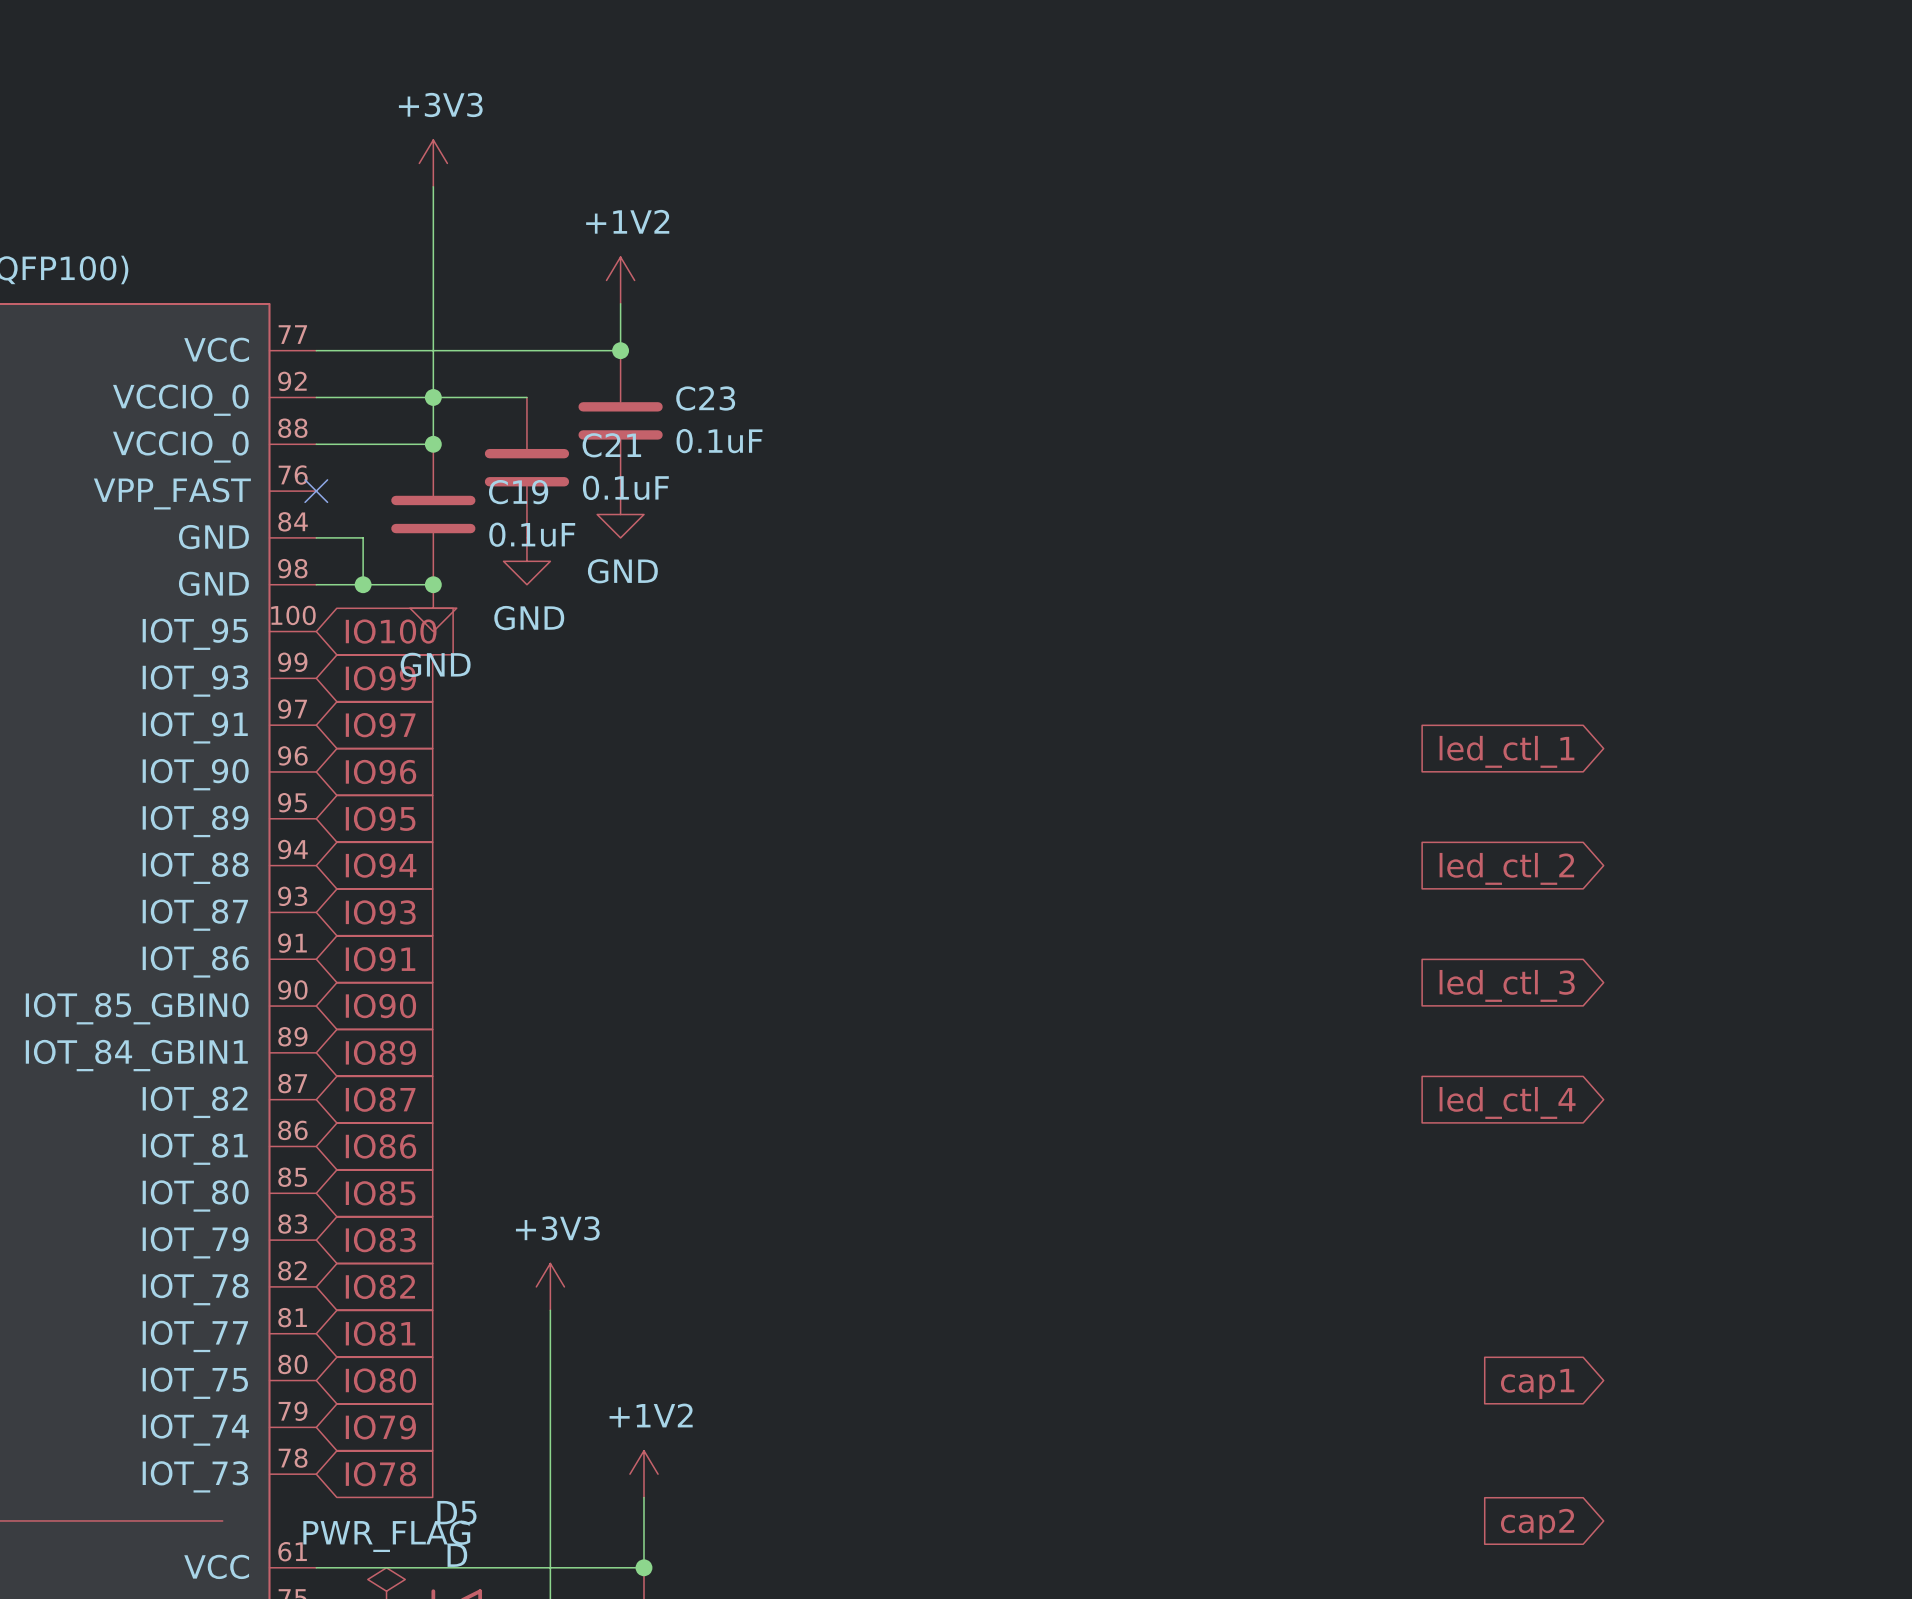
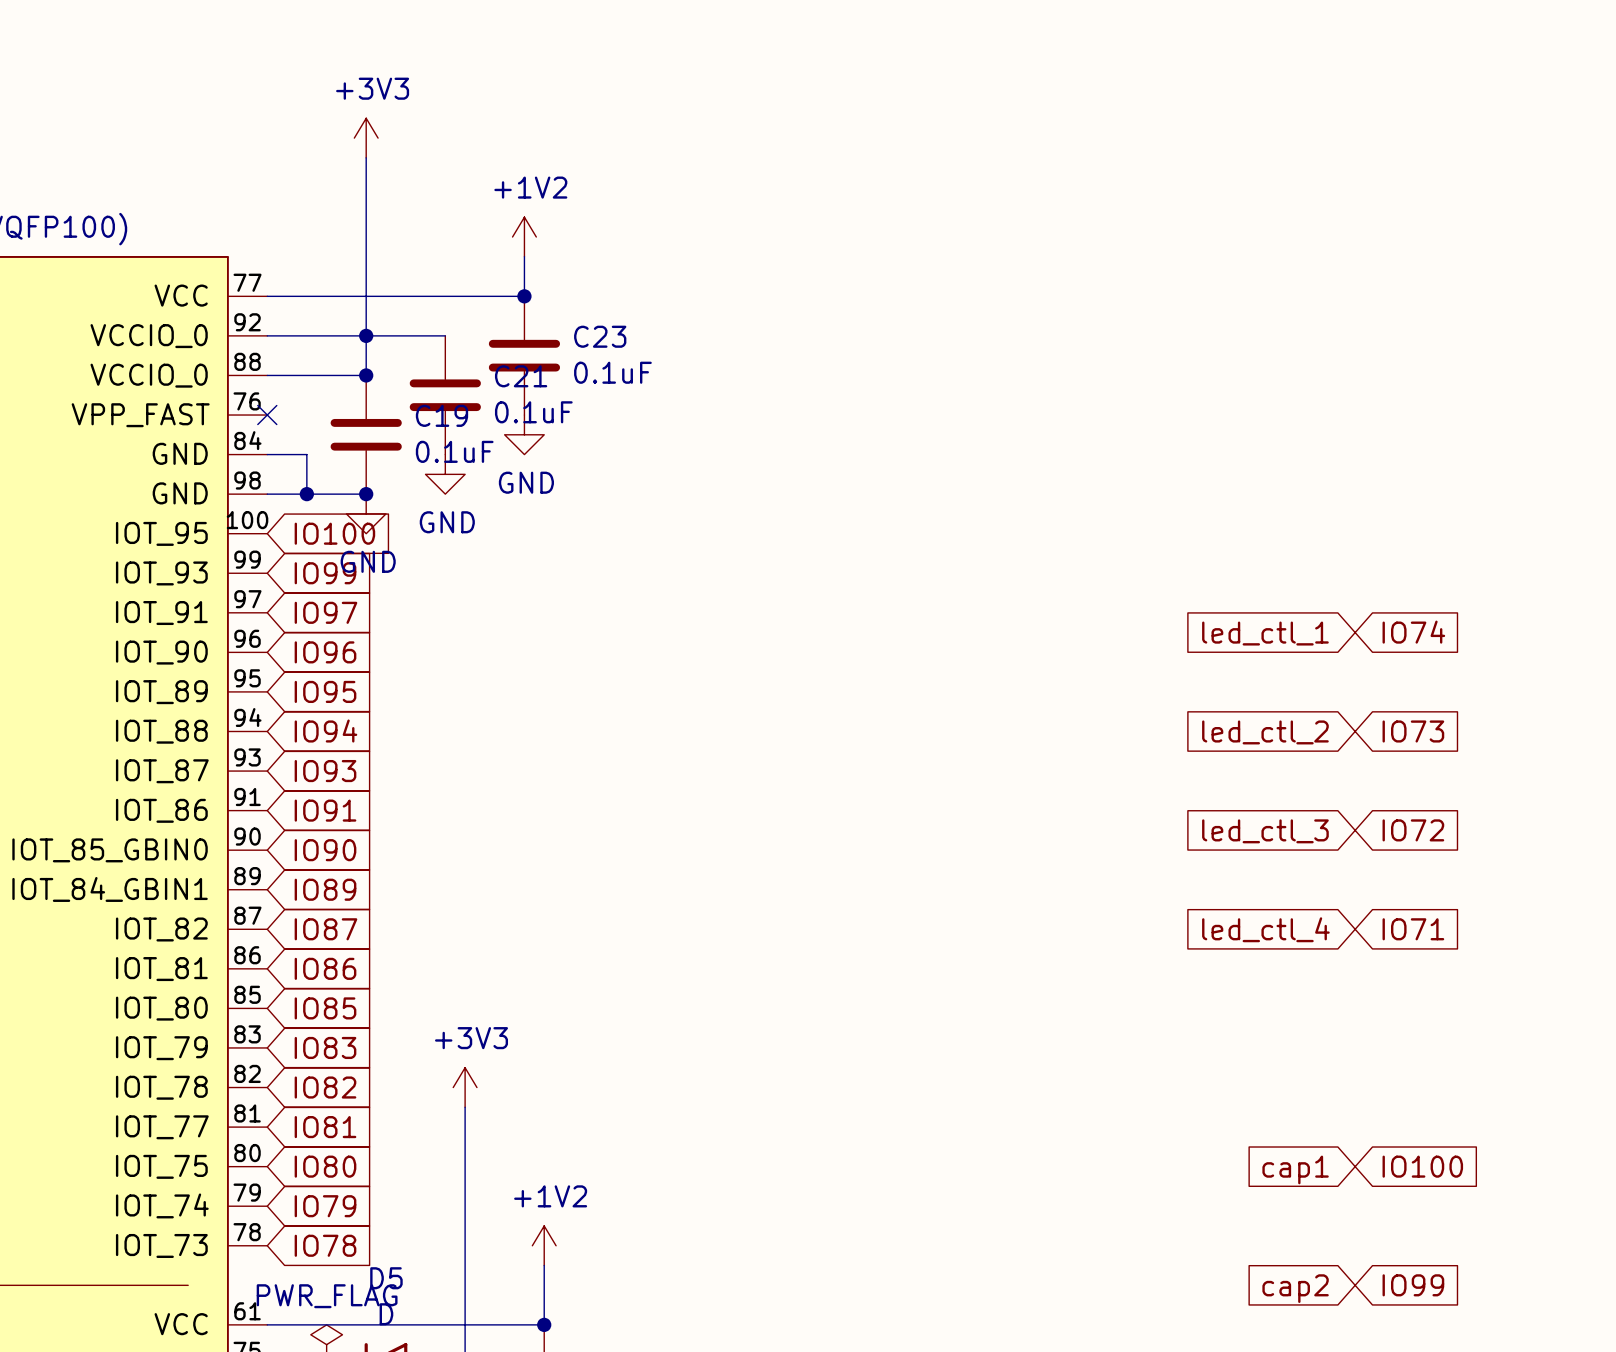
global label: none -> IO74 (1413, 632)
global label: none -> IO73 (1413, 731)
global label: none -> IO72 (1413, 830)
global label: none -> IO71 (1413, 929)
global label: none -> IO100 (1422, 1166)
global label: none -> IO99 (1413, 1285)

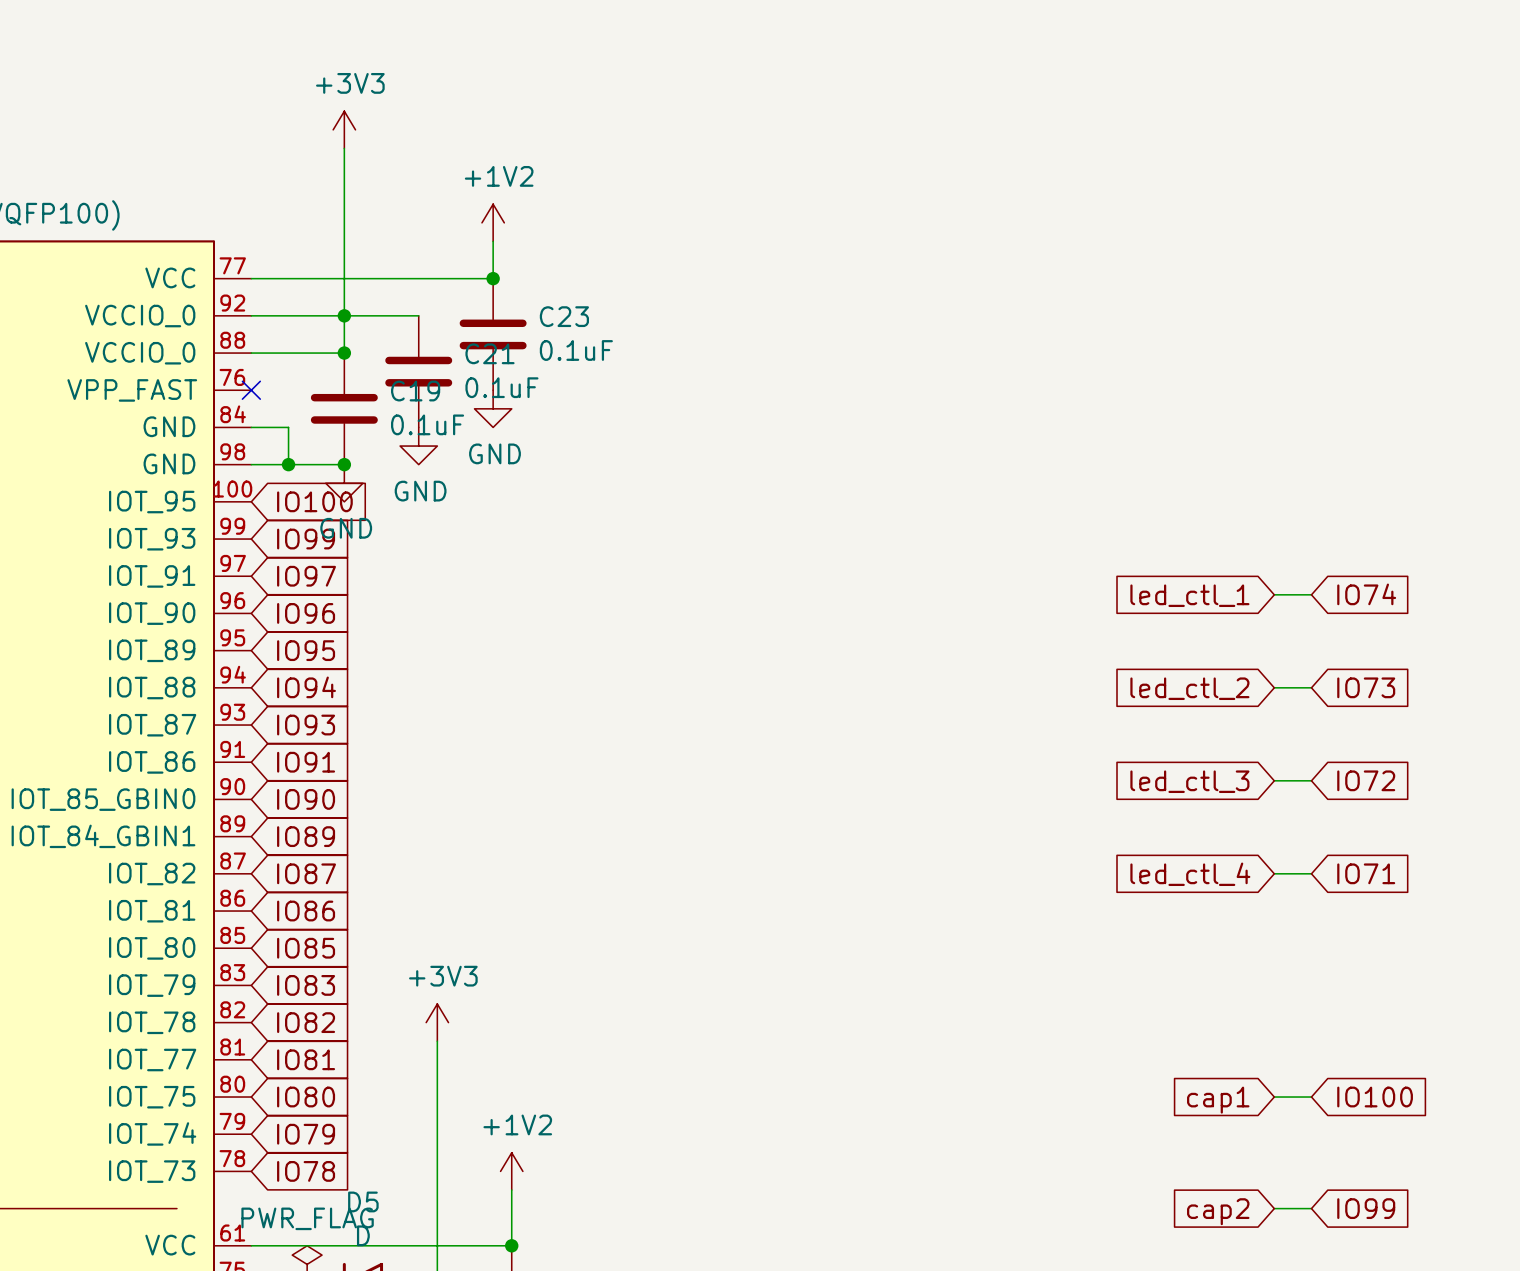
wire: none -> (1274, 594) (1311, 594)
global label position: IO74 (1413, 632) -> IO74 (1366, 594)
wire: none -> (1274, 687) (1311, 687)
global label position: IO73 (1413, 731) -> IO73 (1366, 687)
wire: none -> (1274, 780) (1311, 780)
global label position: IO72 (1413, 830) -> IO72 (1366, 780)
wire: none -> (1274, 873) (1311, 873)
global label position: IO71 (1413, 929) -> IO71 (1366, 873)
wire: none -> (1274, 1097) (1311, 1097)
global label position: IO100 (1422, 1166) -> IO100 (1375, 1097)
wire: none -> (1274, 1208) (1311, 1208)
global label position: IO99 (1413, 1285) -> IO99 (1366, 1208)

